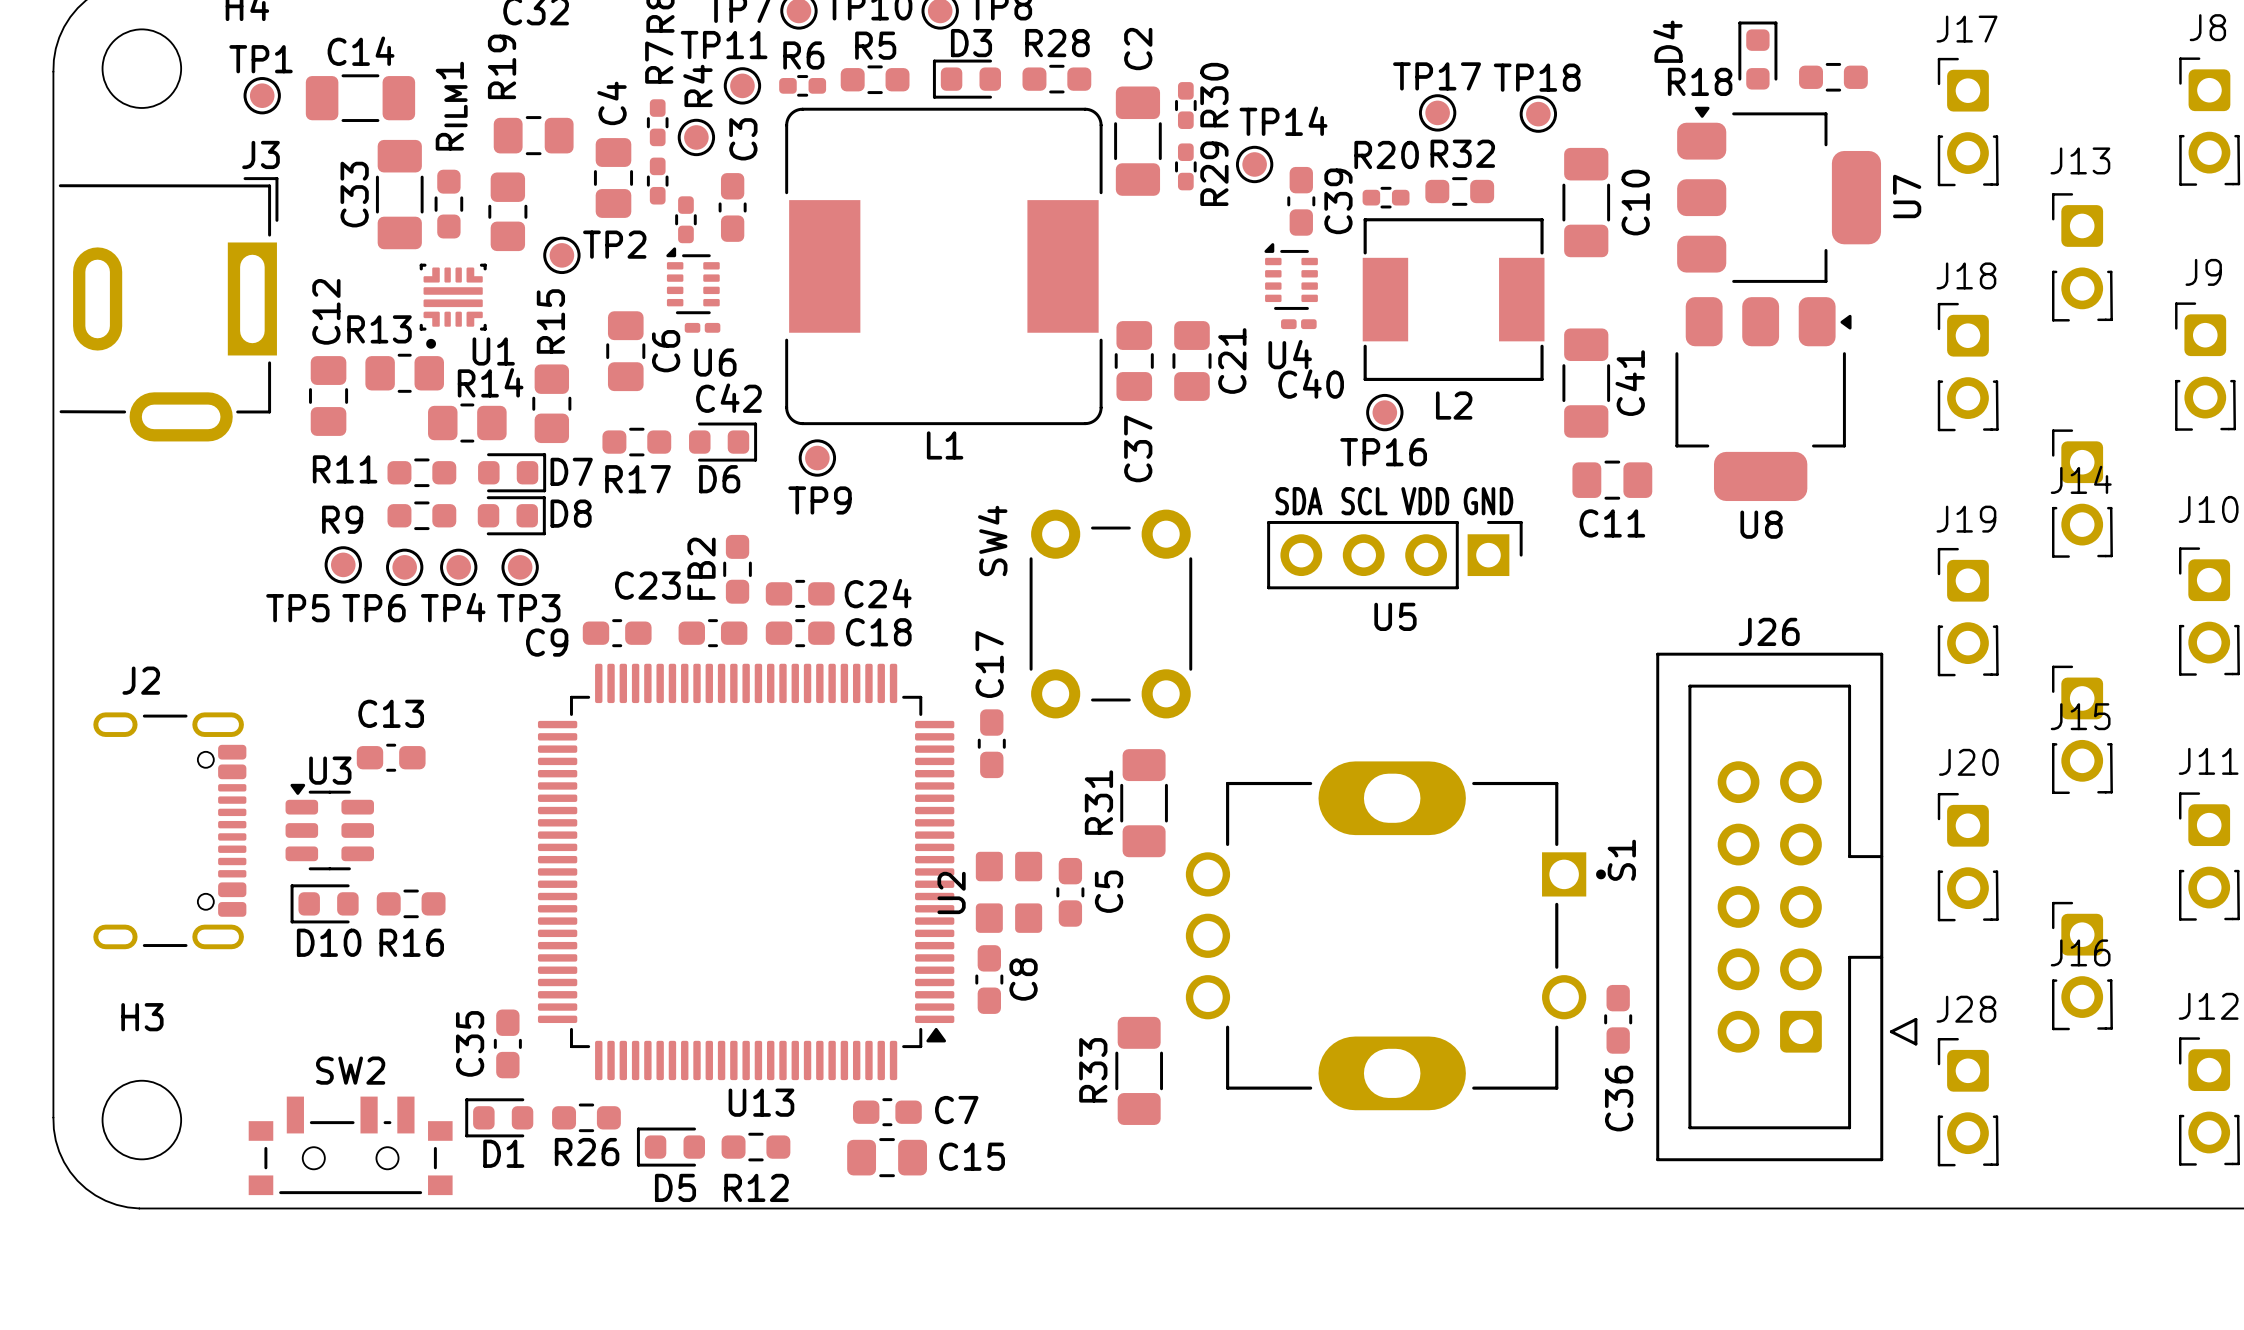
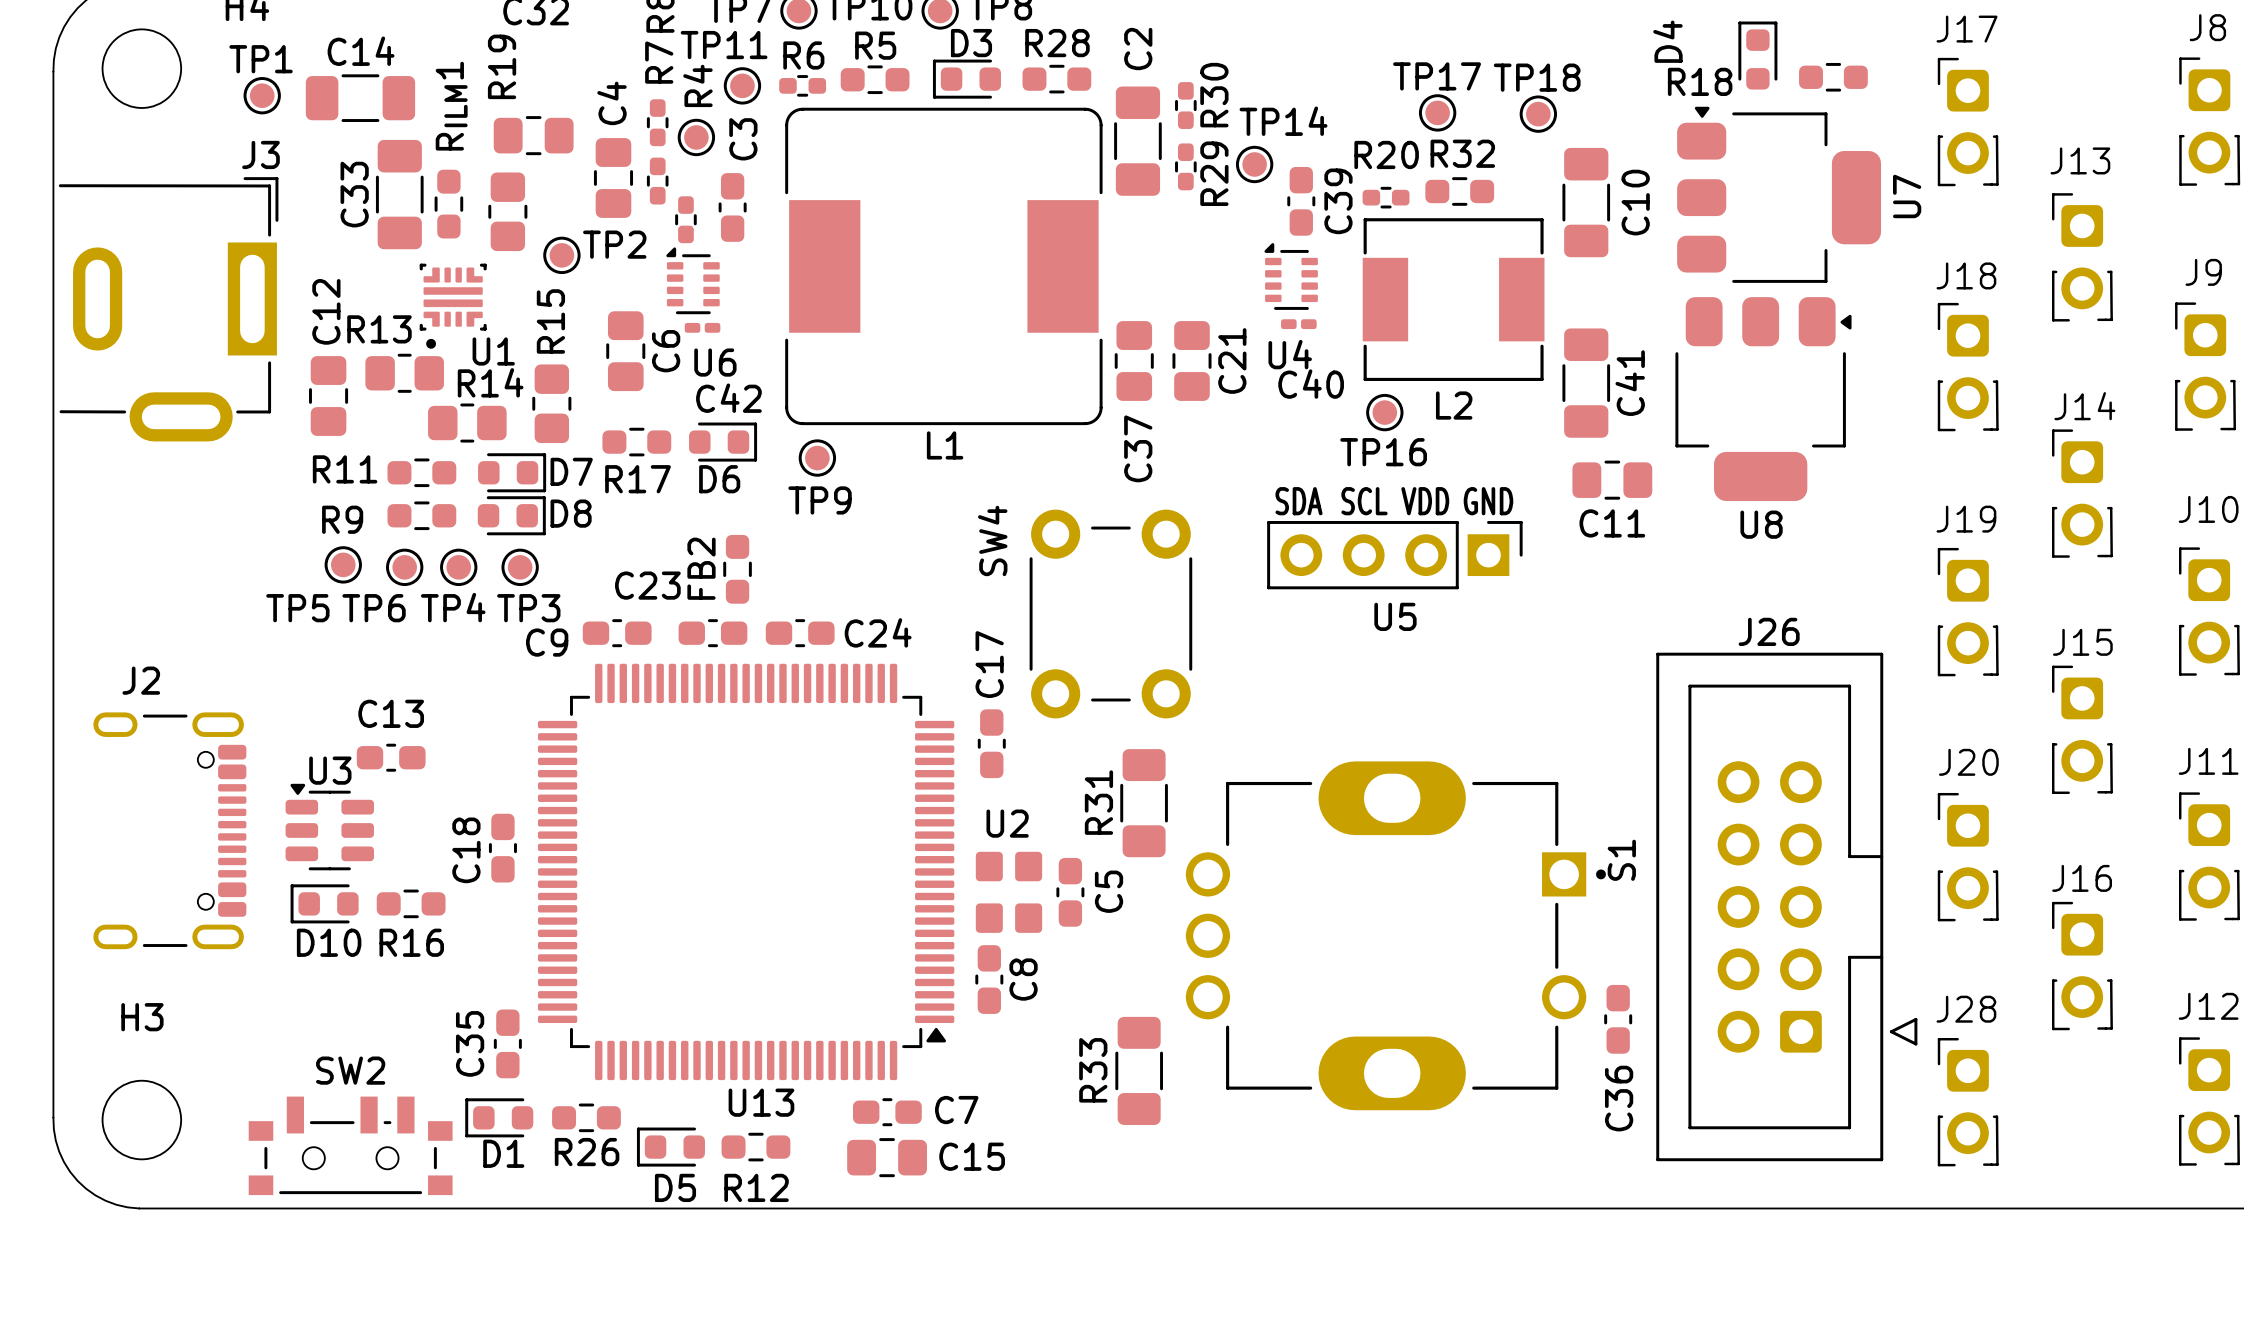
J14 name position: J14 (2081, 479) -> J14 (2084, 406)
C24: (800, 593) -> none
C18 name: C18 (878, 632) -> C24 (878, 632)
J15 name position: J15 (2080, 716) -> J15 (2082, 642)
C18: none -> (502, 848)
U2 name rotation: 0° (951, 892) -> 90° clockwise (1007, 823)
U2 name position: U2 (951, 892) -> U2 (1007, 823)
J16 name position: J16 (2080, 952) -> J16 (2082, 878)

